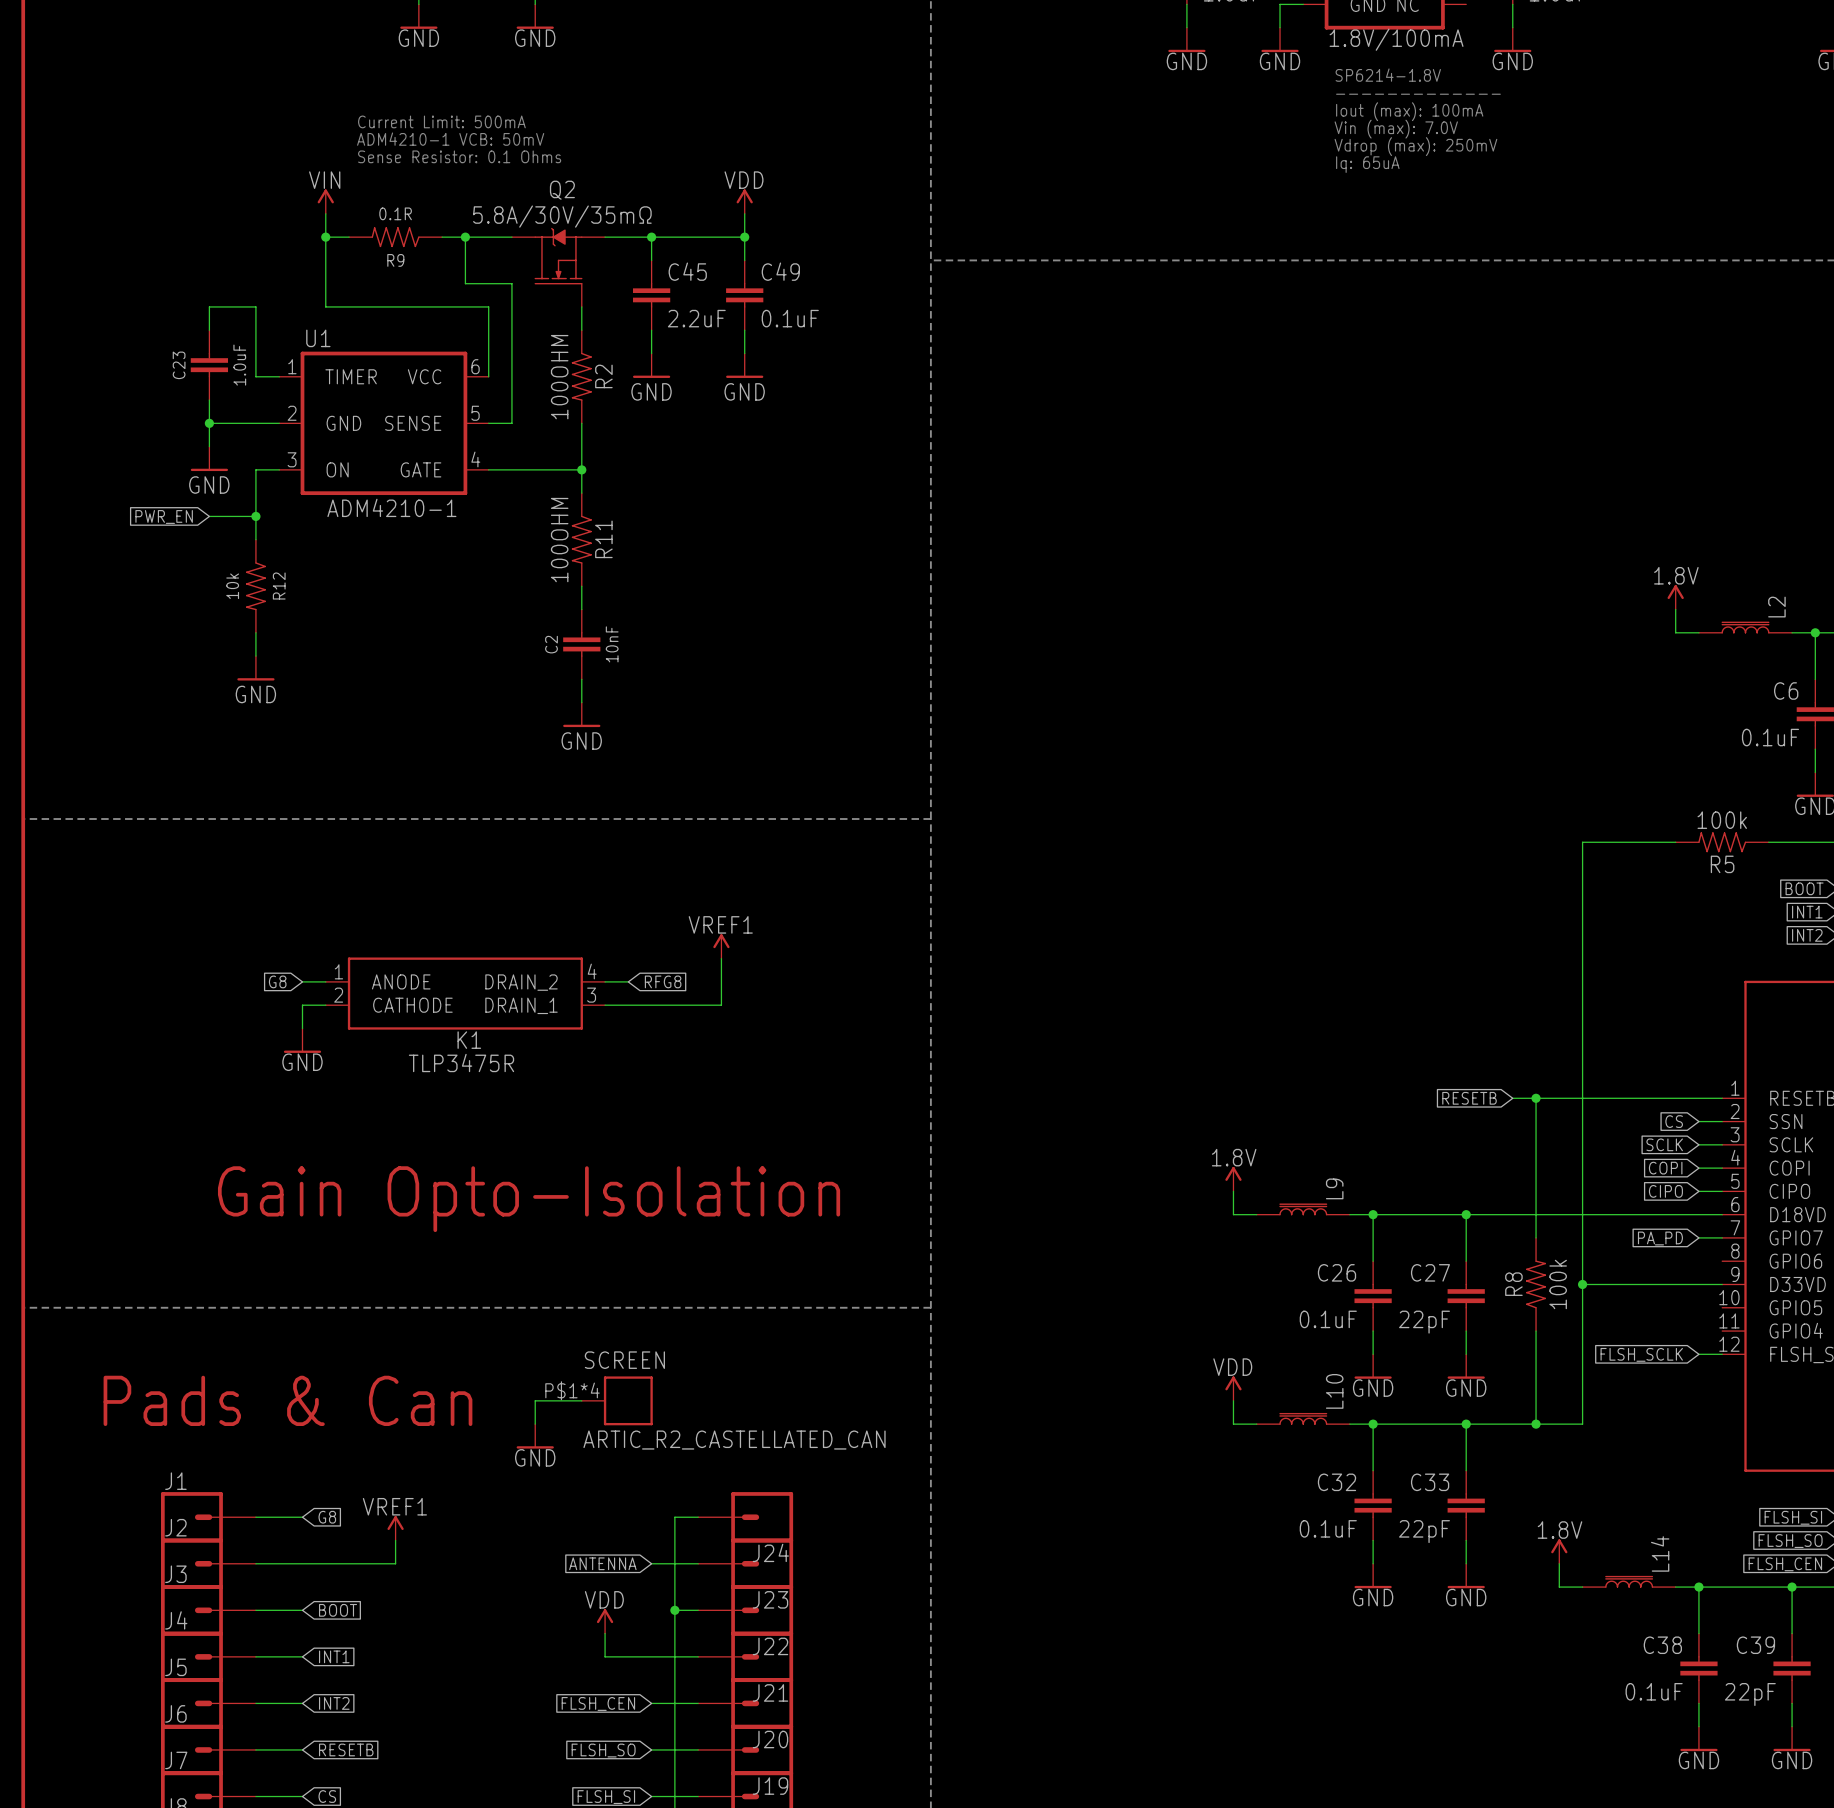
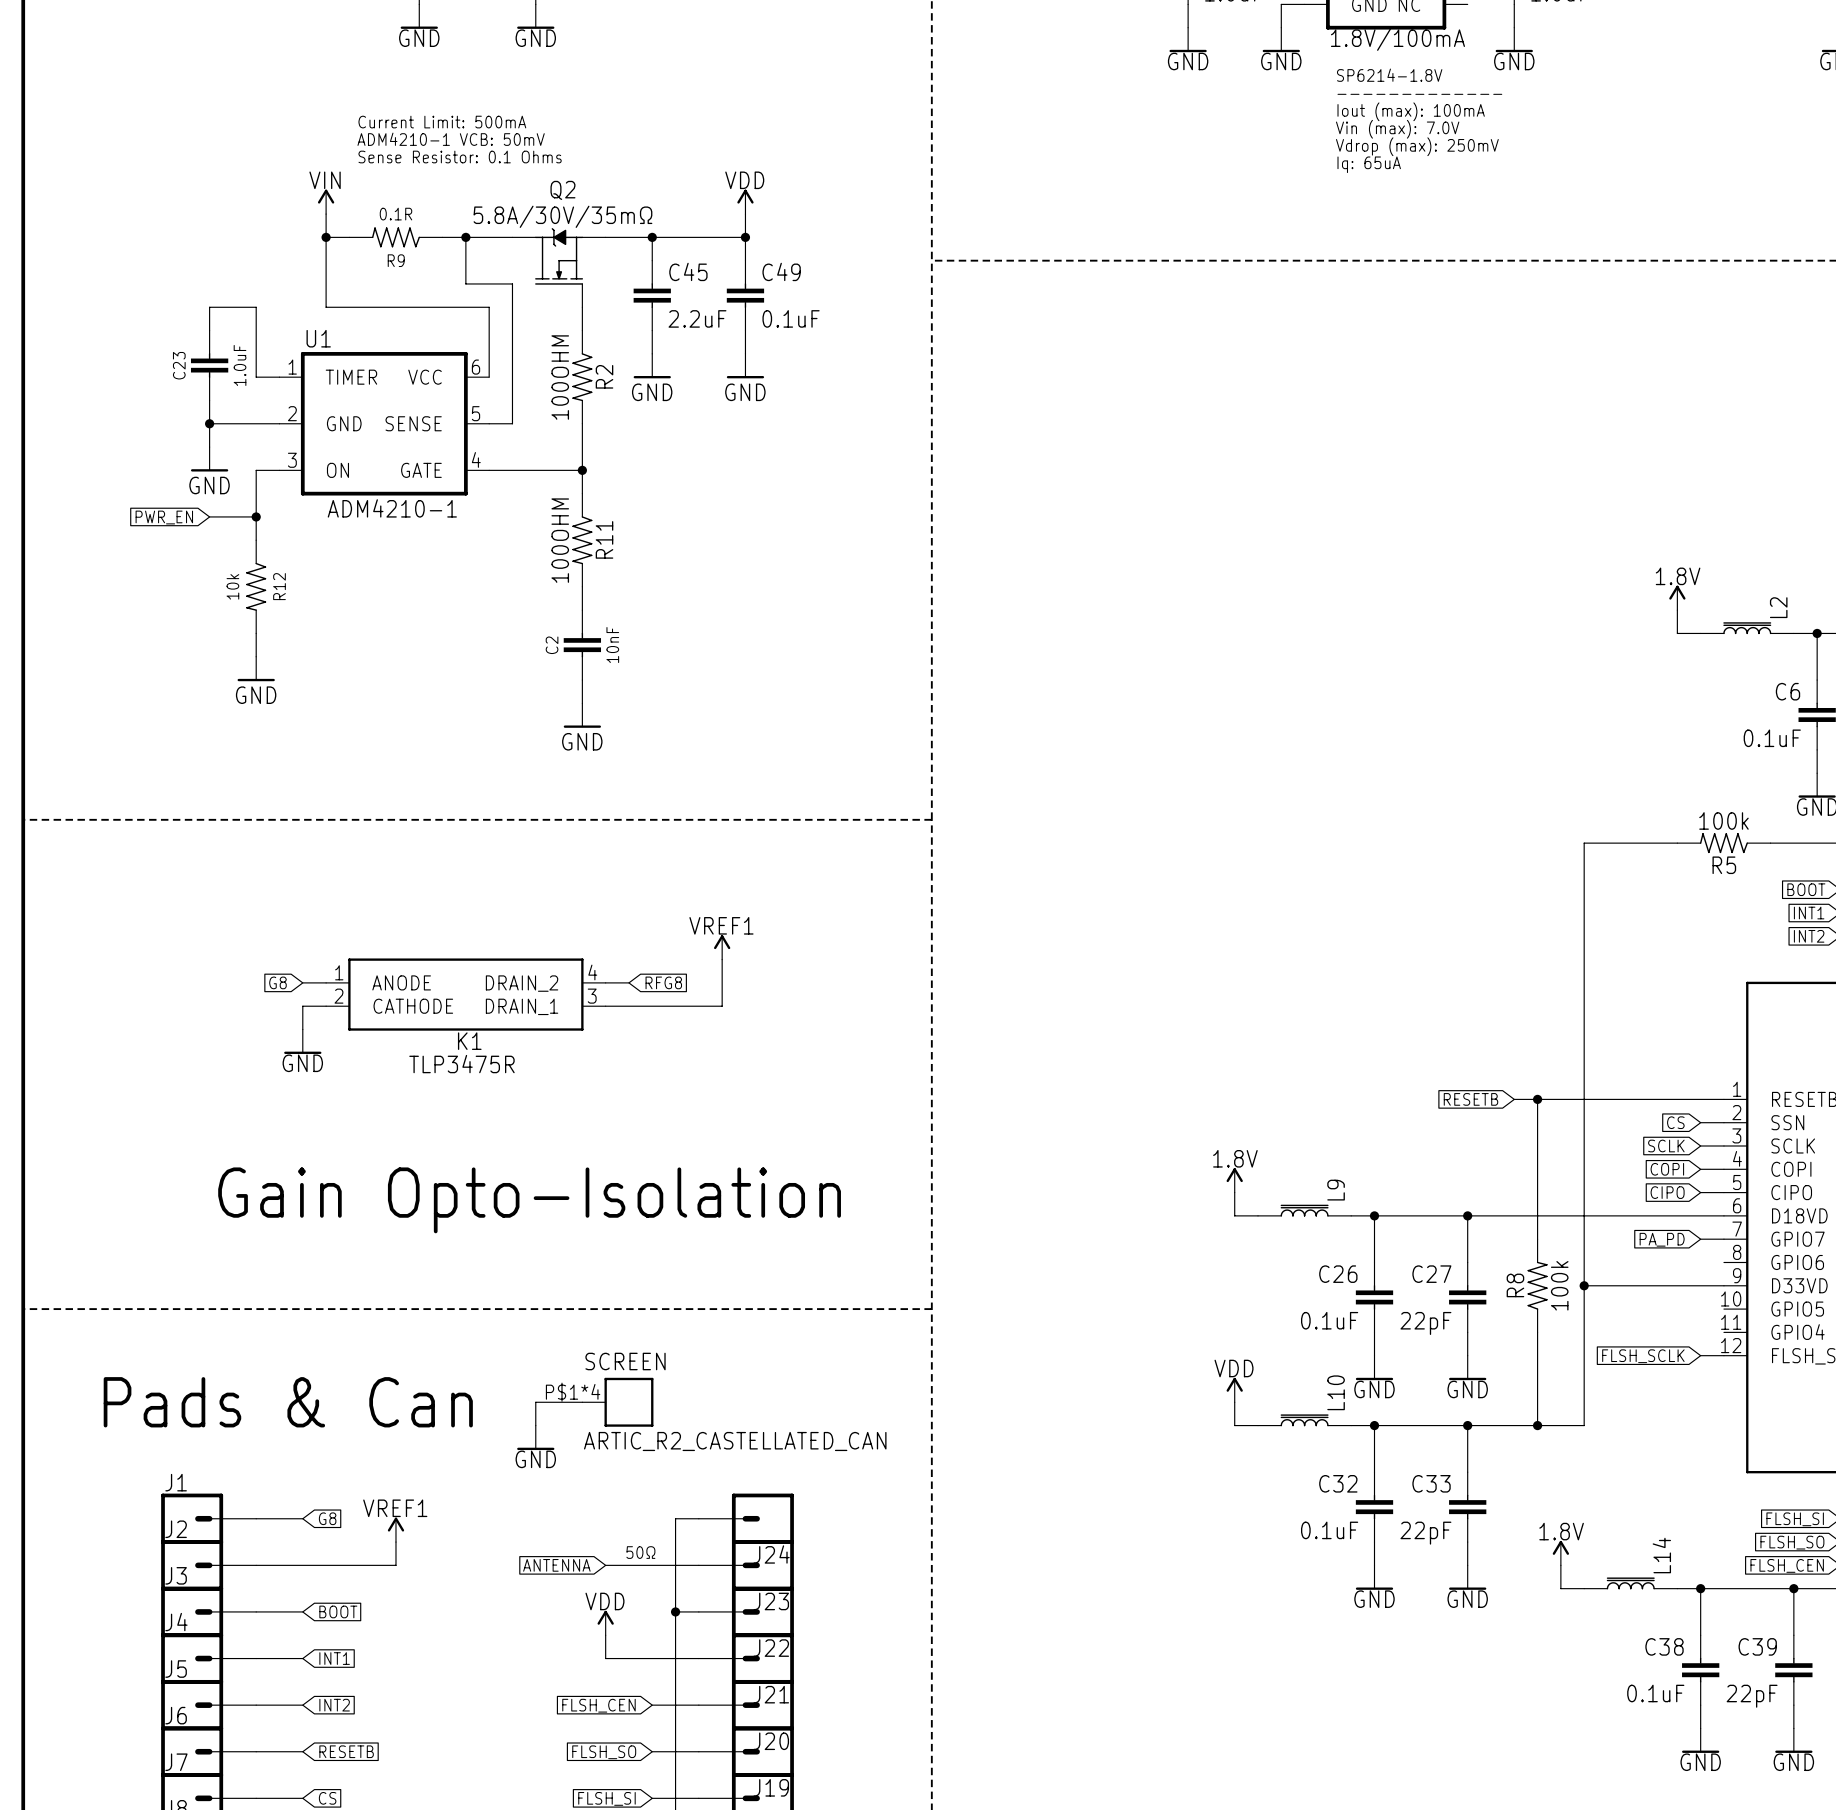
text: none -> 50Ω (640, 1552)
global label position: ANTENNA (602, 1563) -> ANTENNA (556, 1565)
wire: none -> (605, 1565) (652, 1565)

